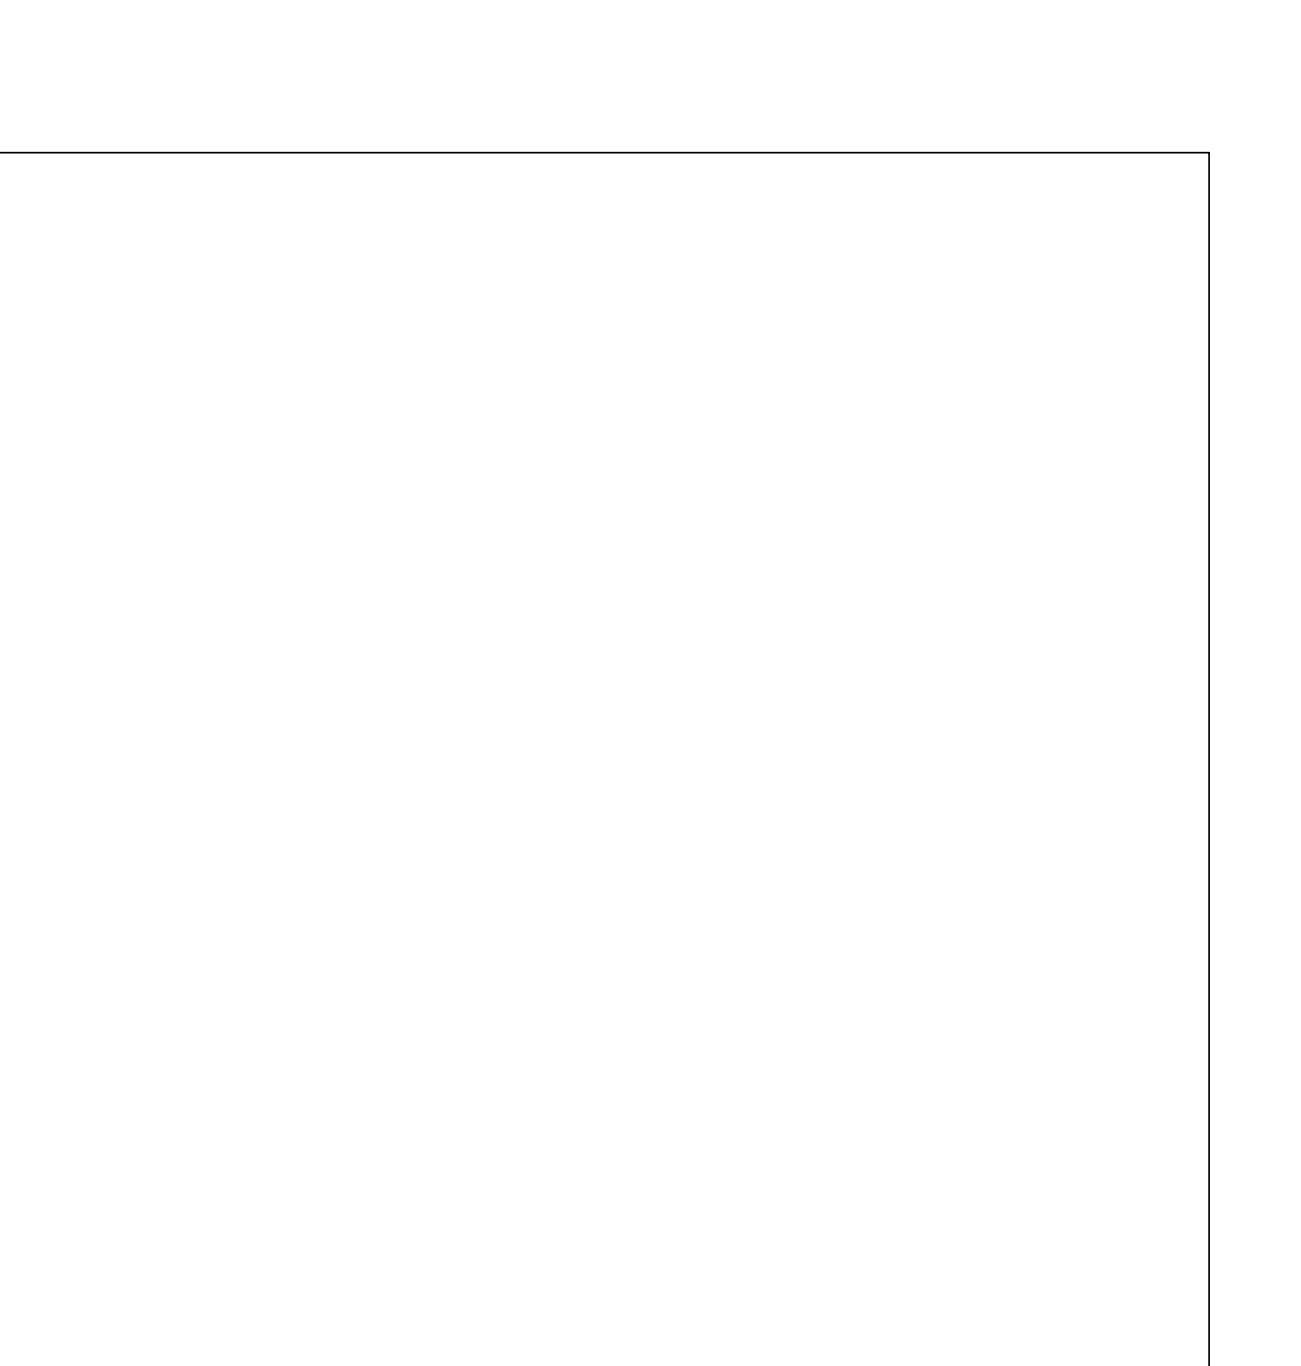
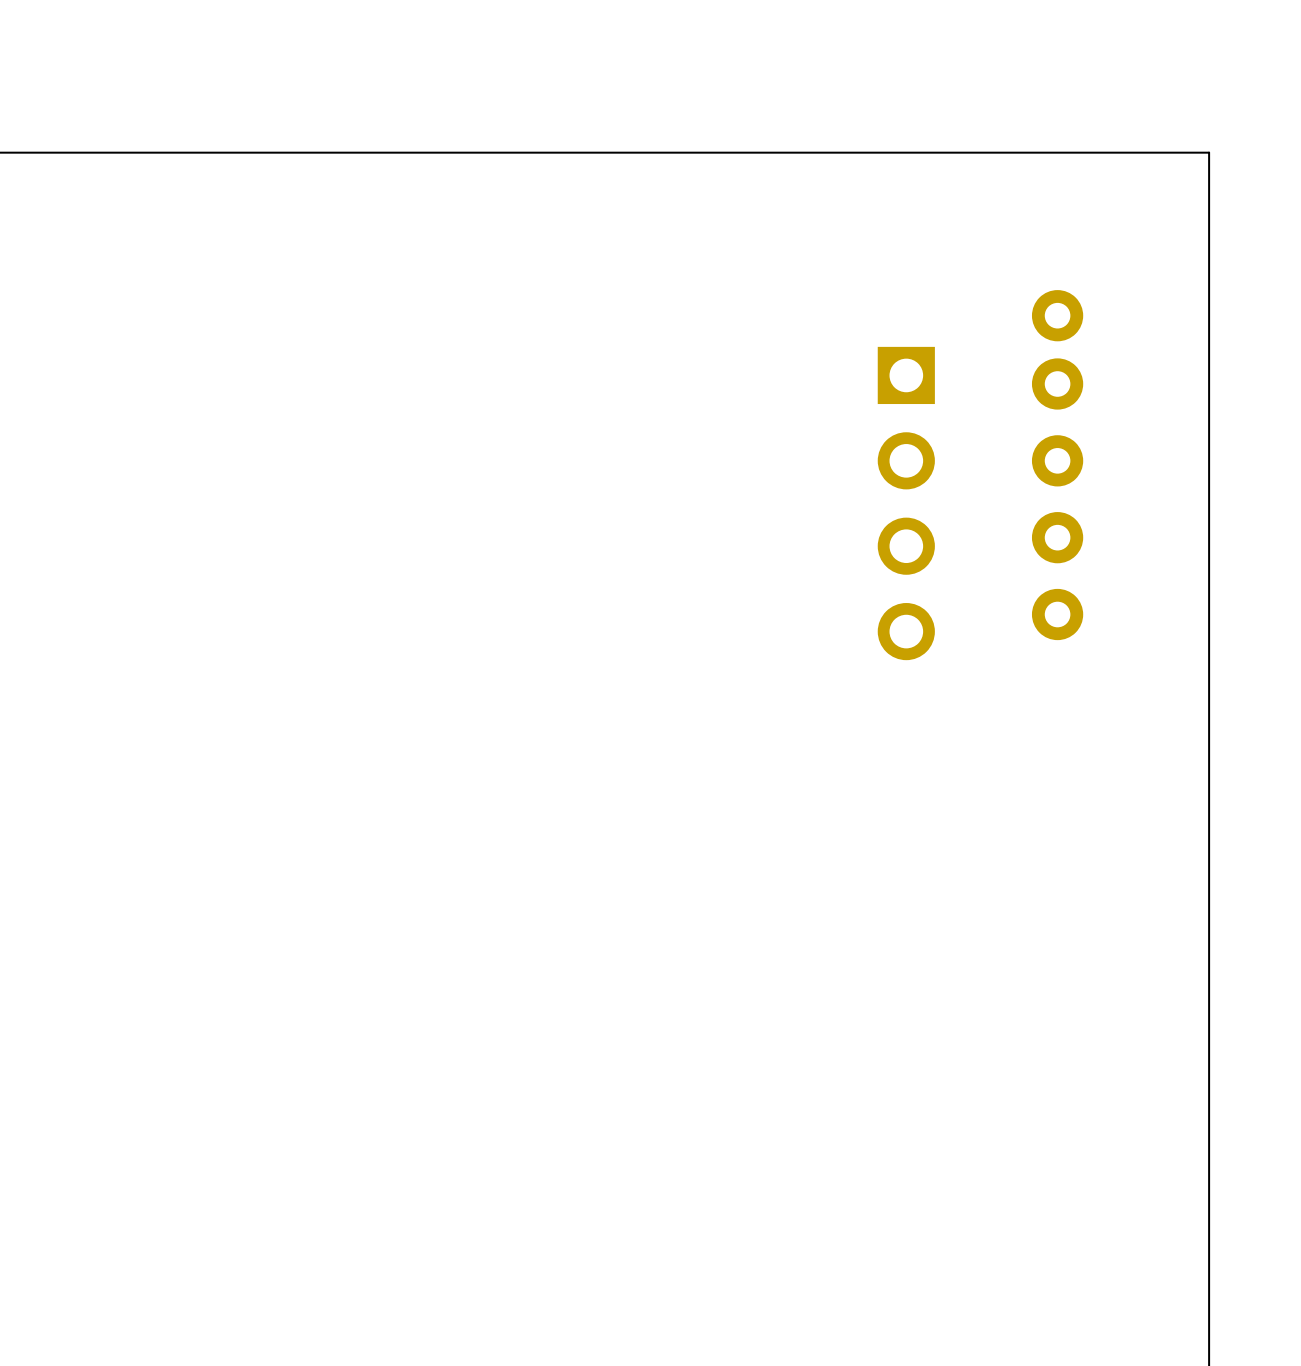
part: none -> (1057, 465)
part: none -> (906, 503)

